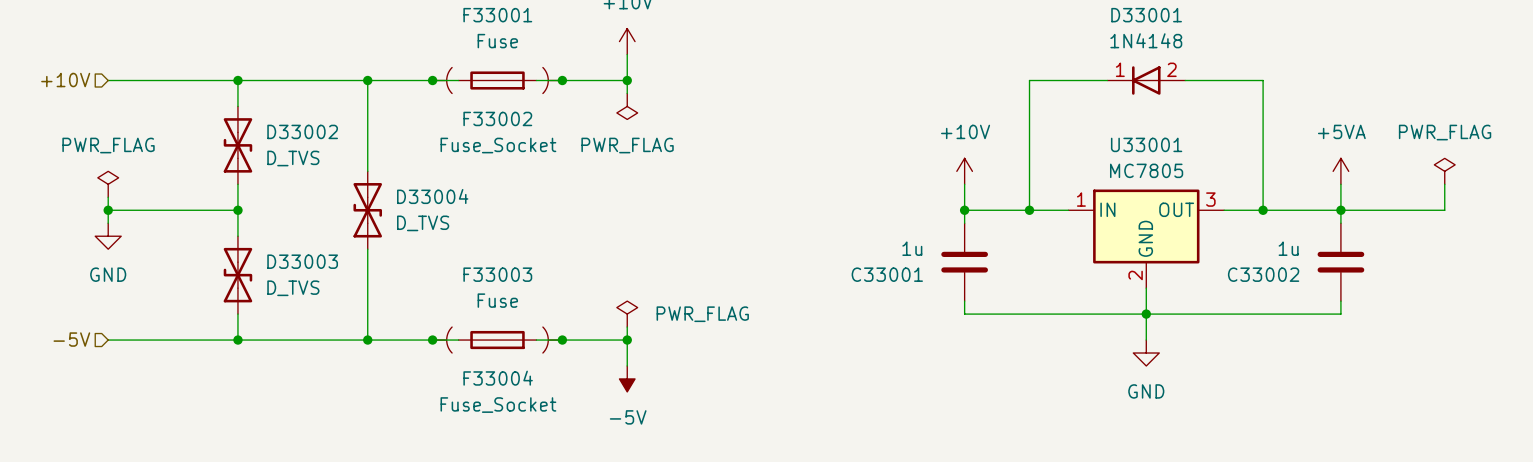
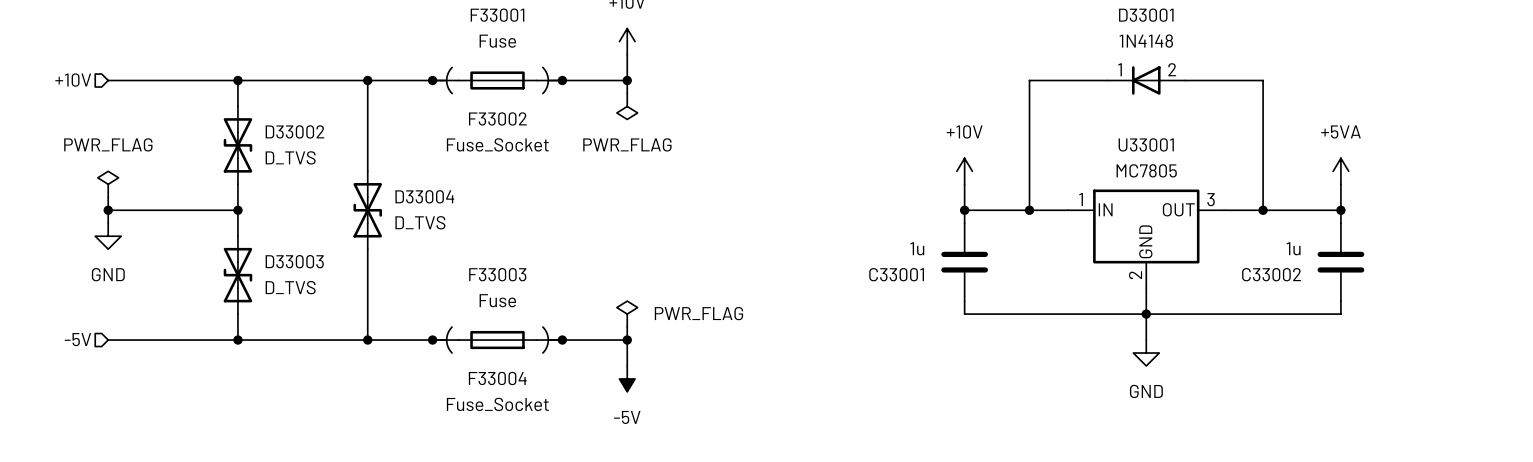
power symbol: PWR_FLAG (1444, 171) -> none
wire: (1444, 184) (1444, 210) (1340, 210) -> none

